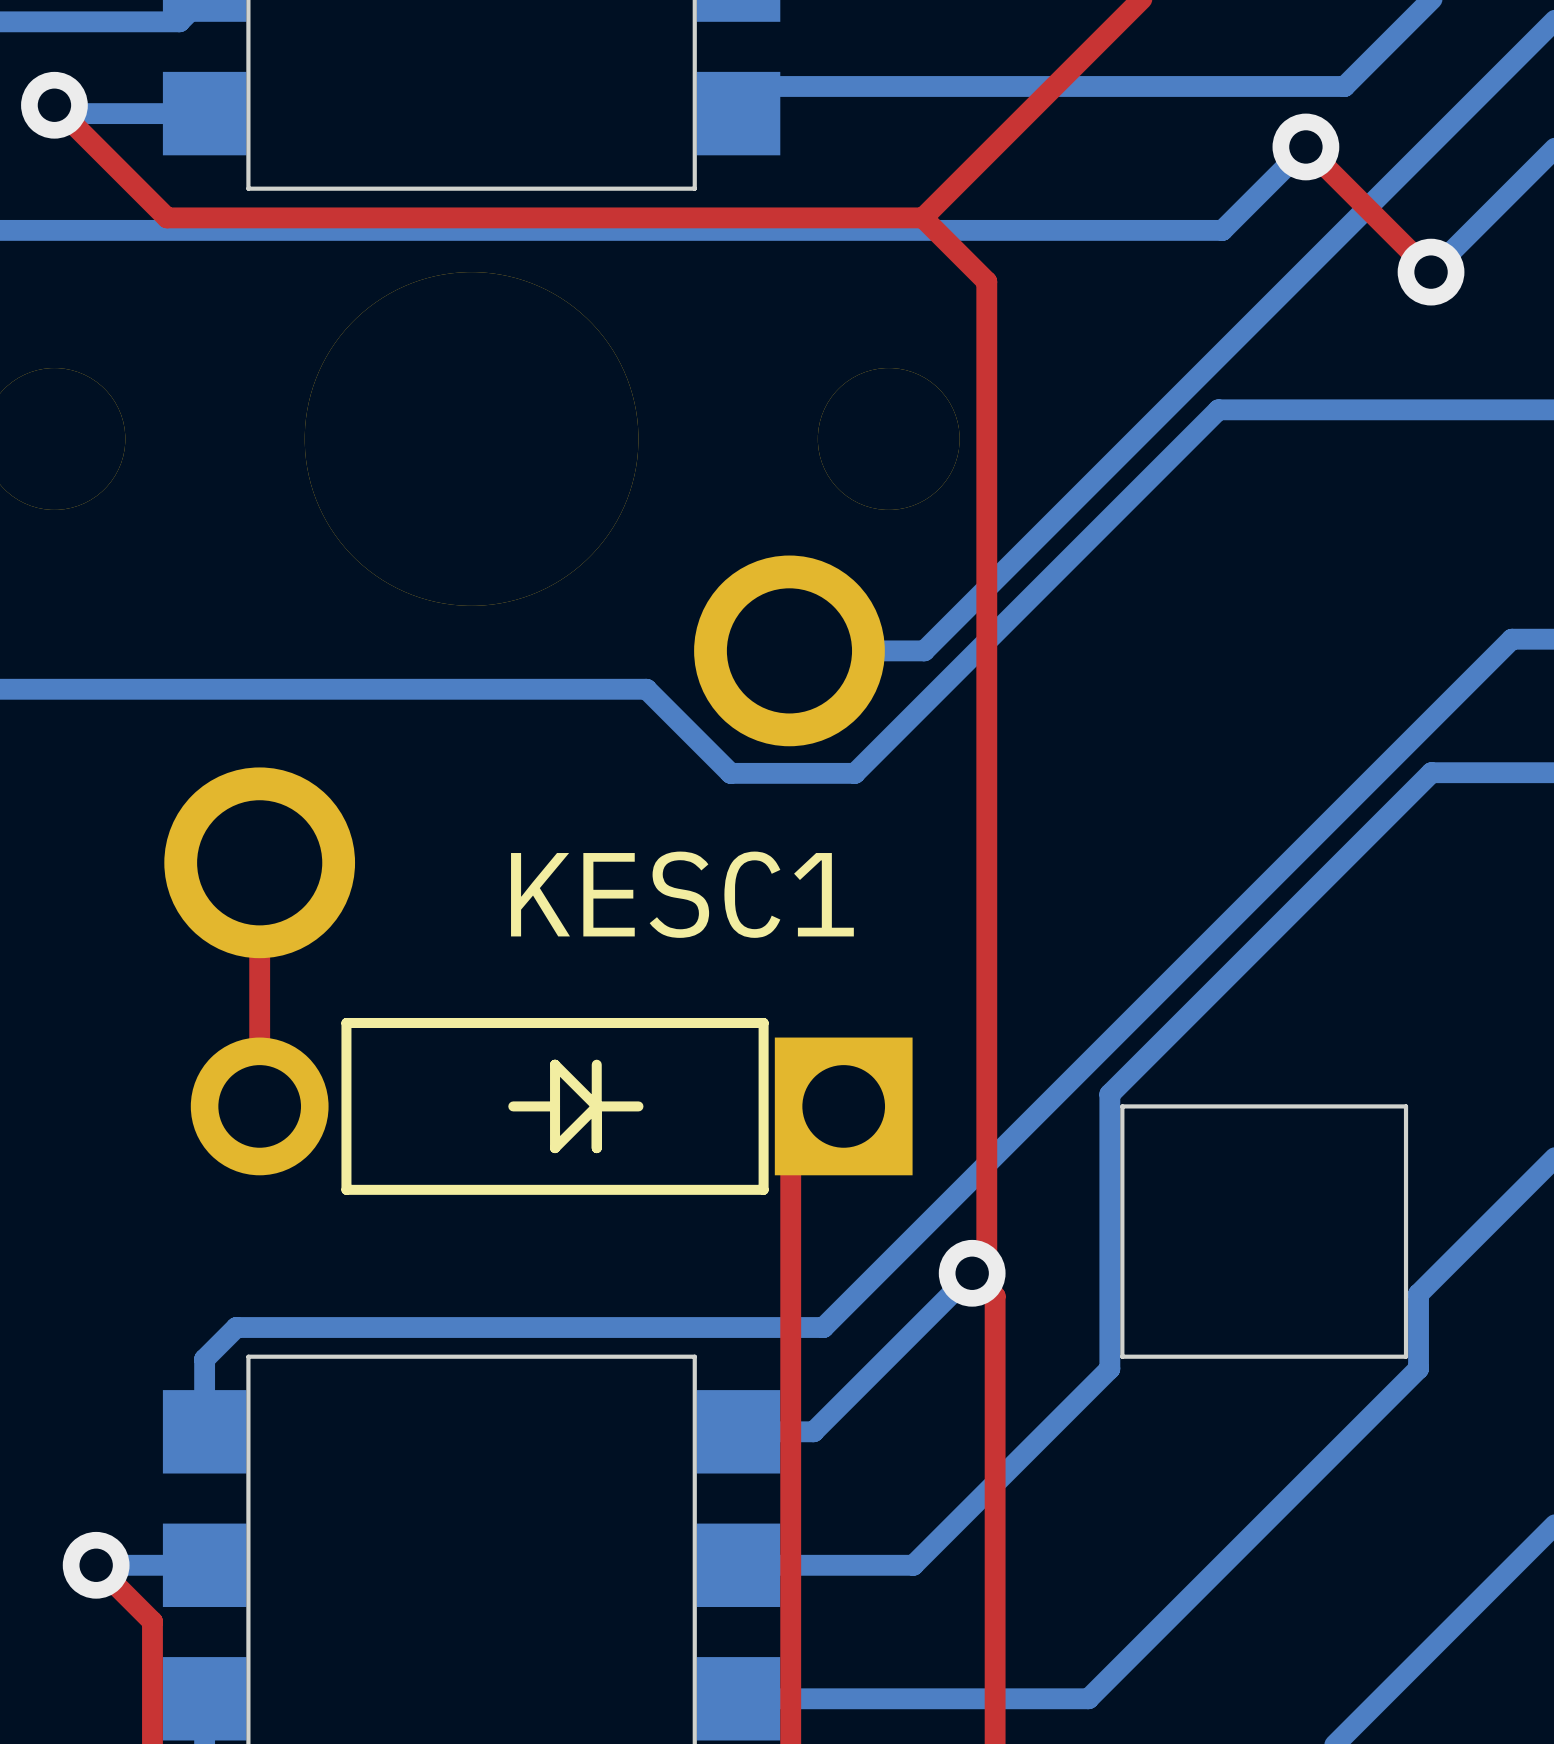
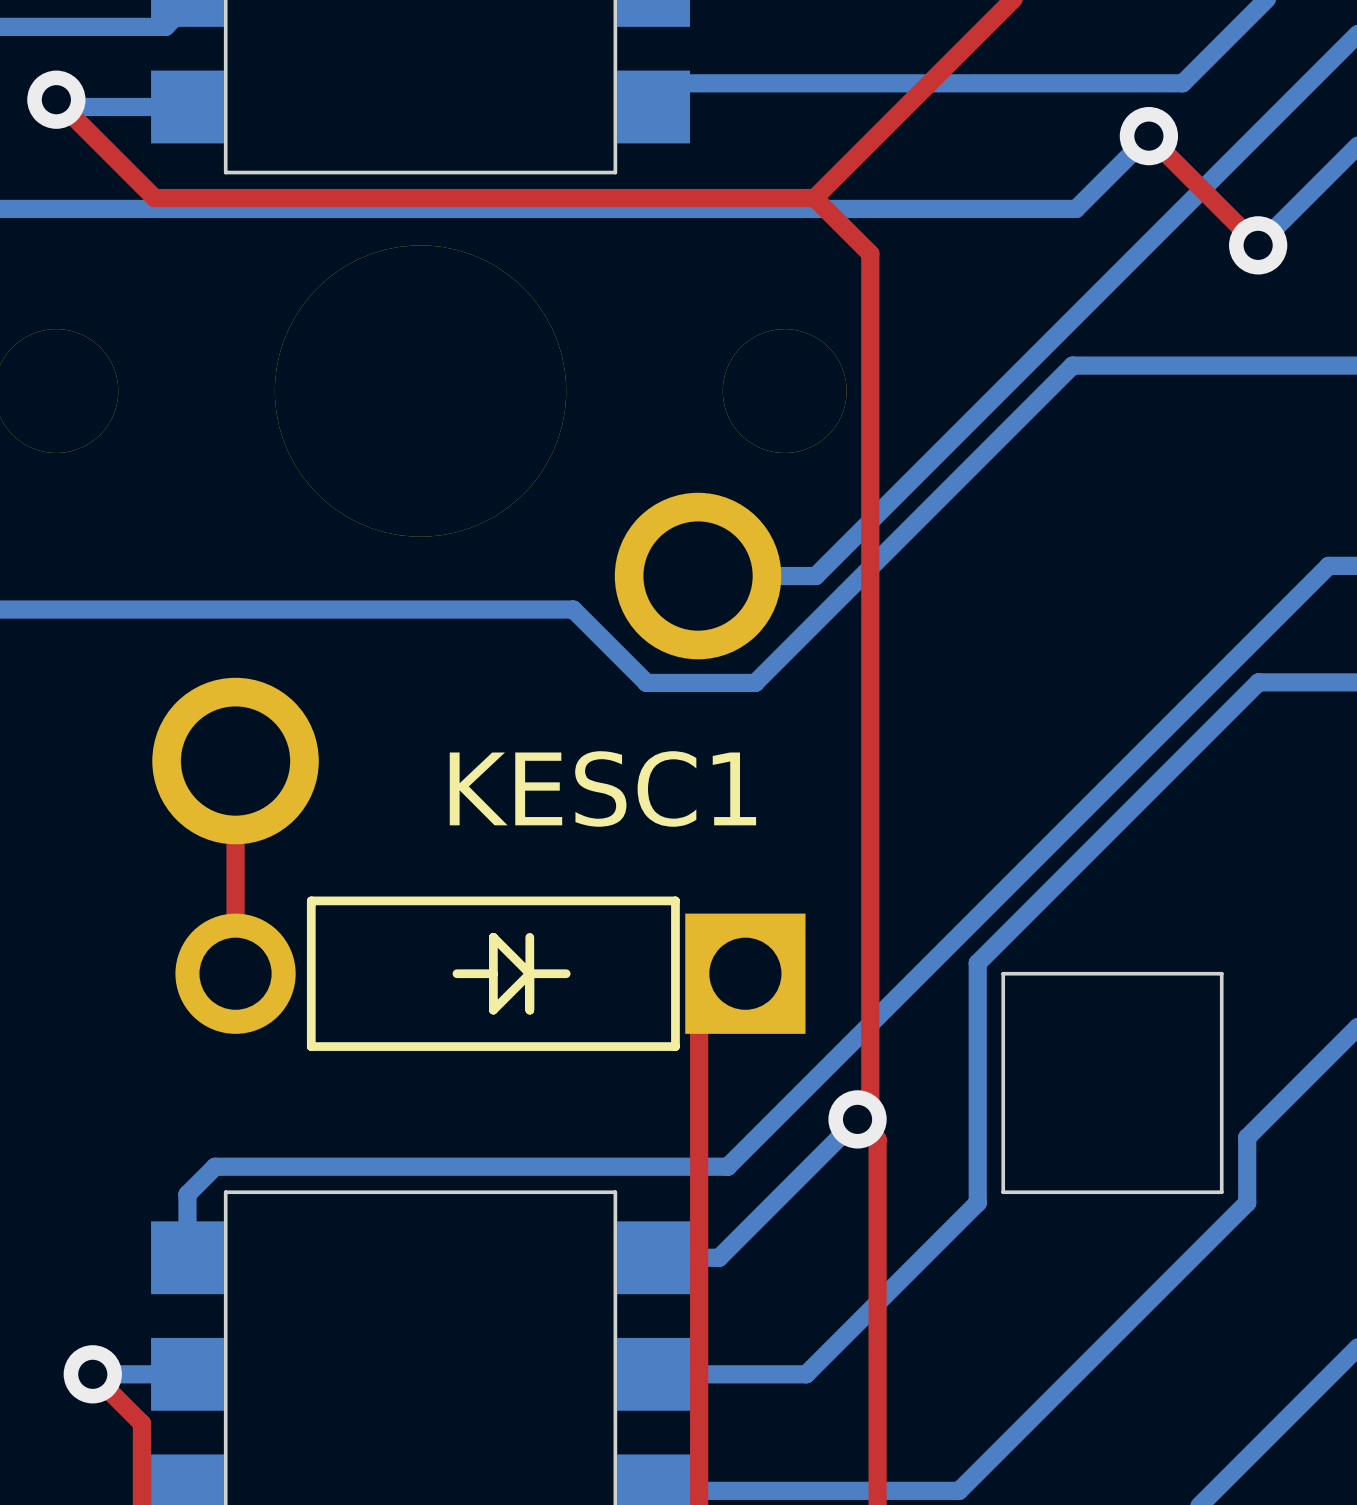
board edge: (1139, 1106) (1122, 1106) (1122, 1356) (1139, 1356) -> (1003, 973) (1003, 1192)
board edge: (1389, 1106) (1406, 1106) (1406, 1356) (1389, 1356) -> (1221, 973) (1221, 1192)

